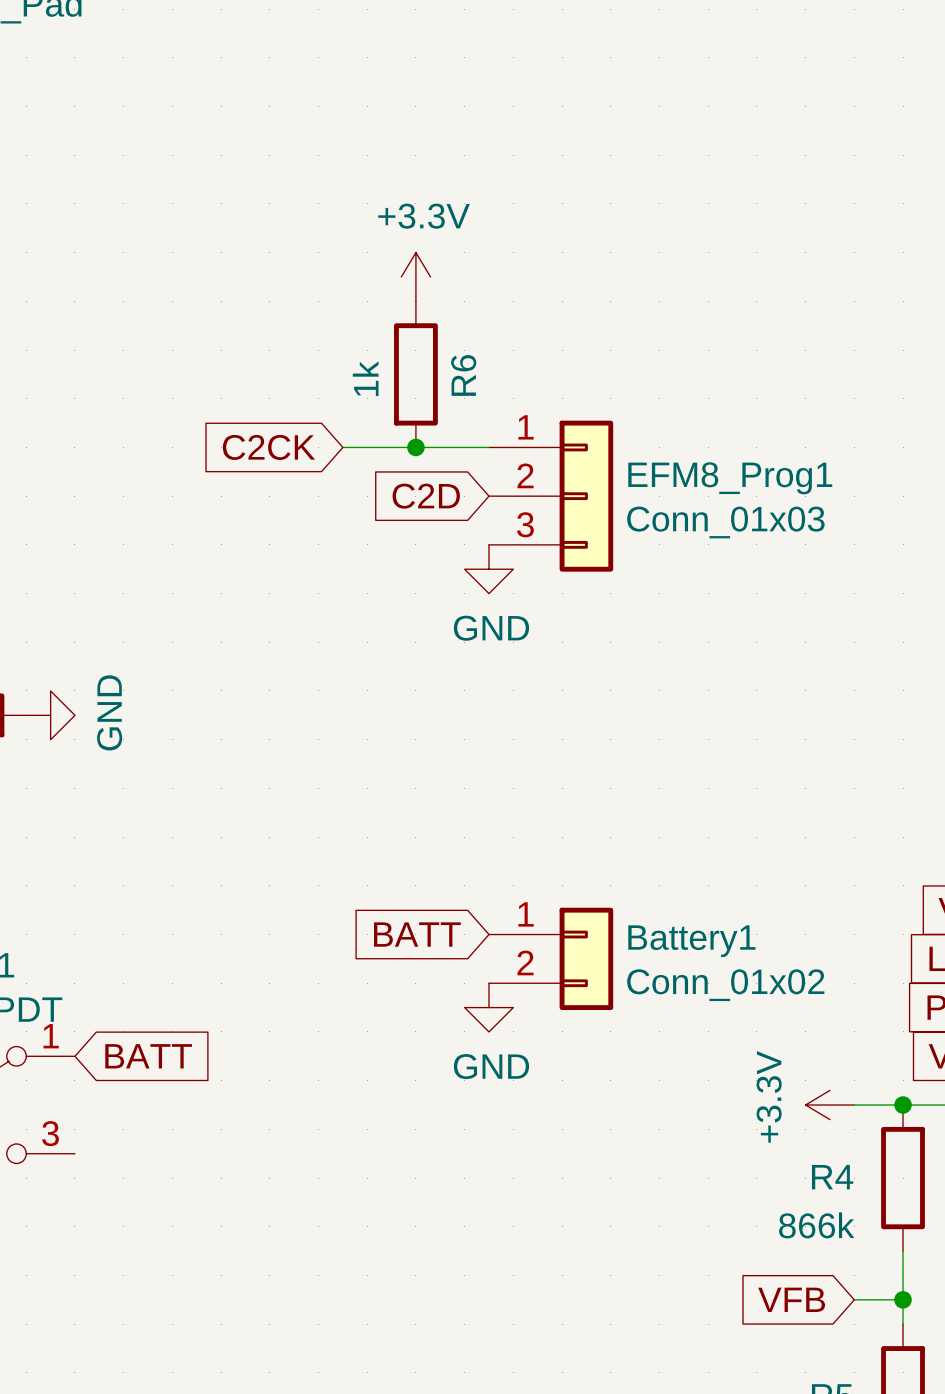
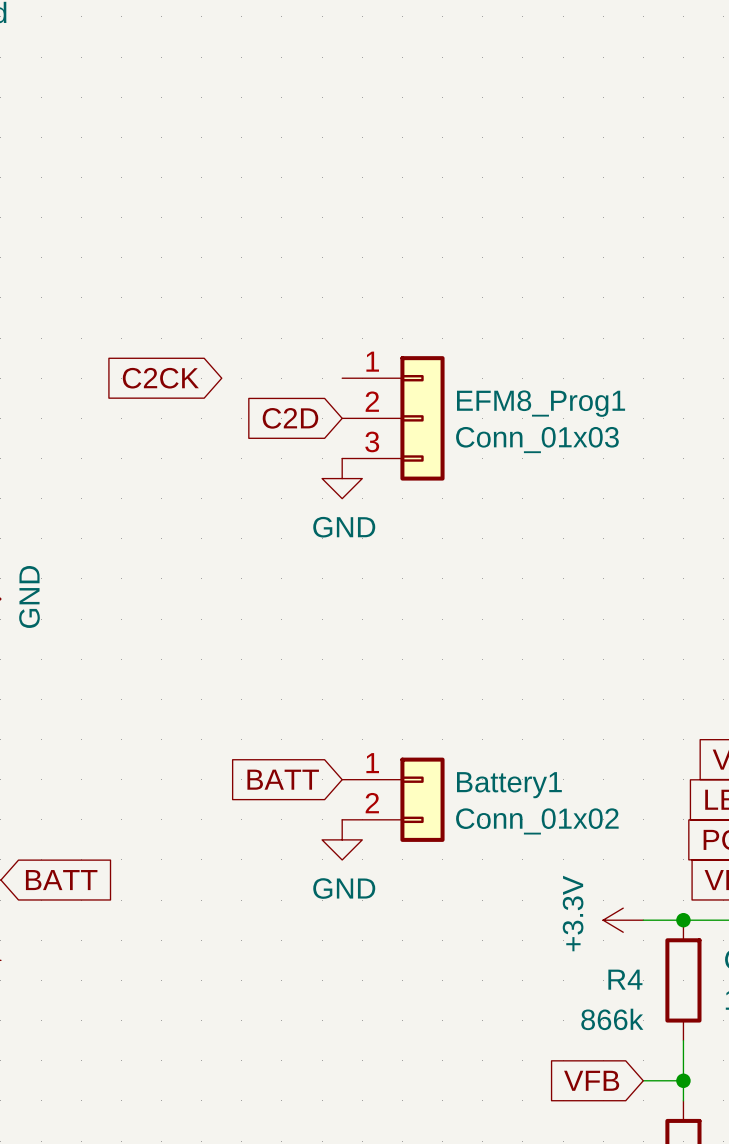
power symbol: +3.3V (415, 276) -> none
R6: 1k (415, 374) -> none
wire: (342, 447) (489, 447) -> none
junction: (415, 447) -> none

